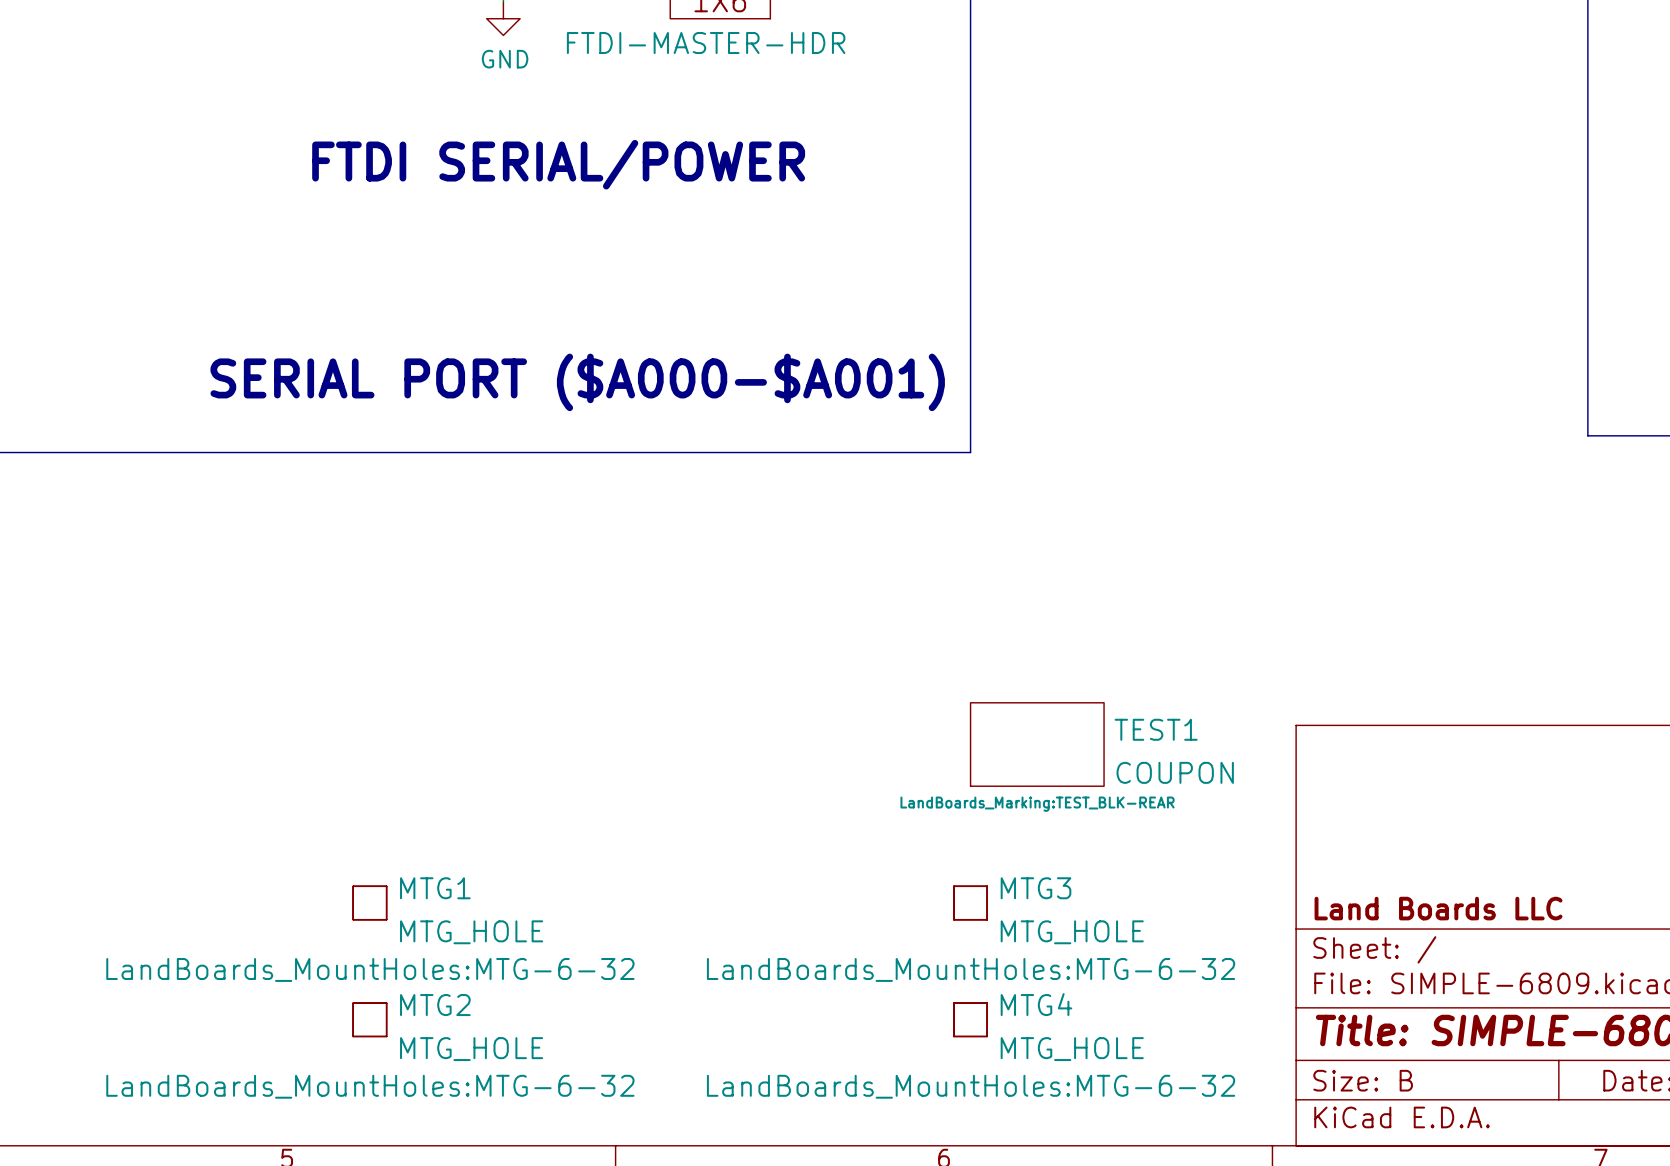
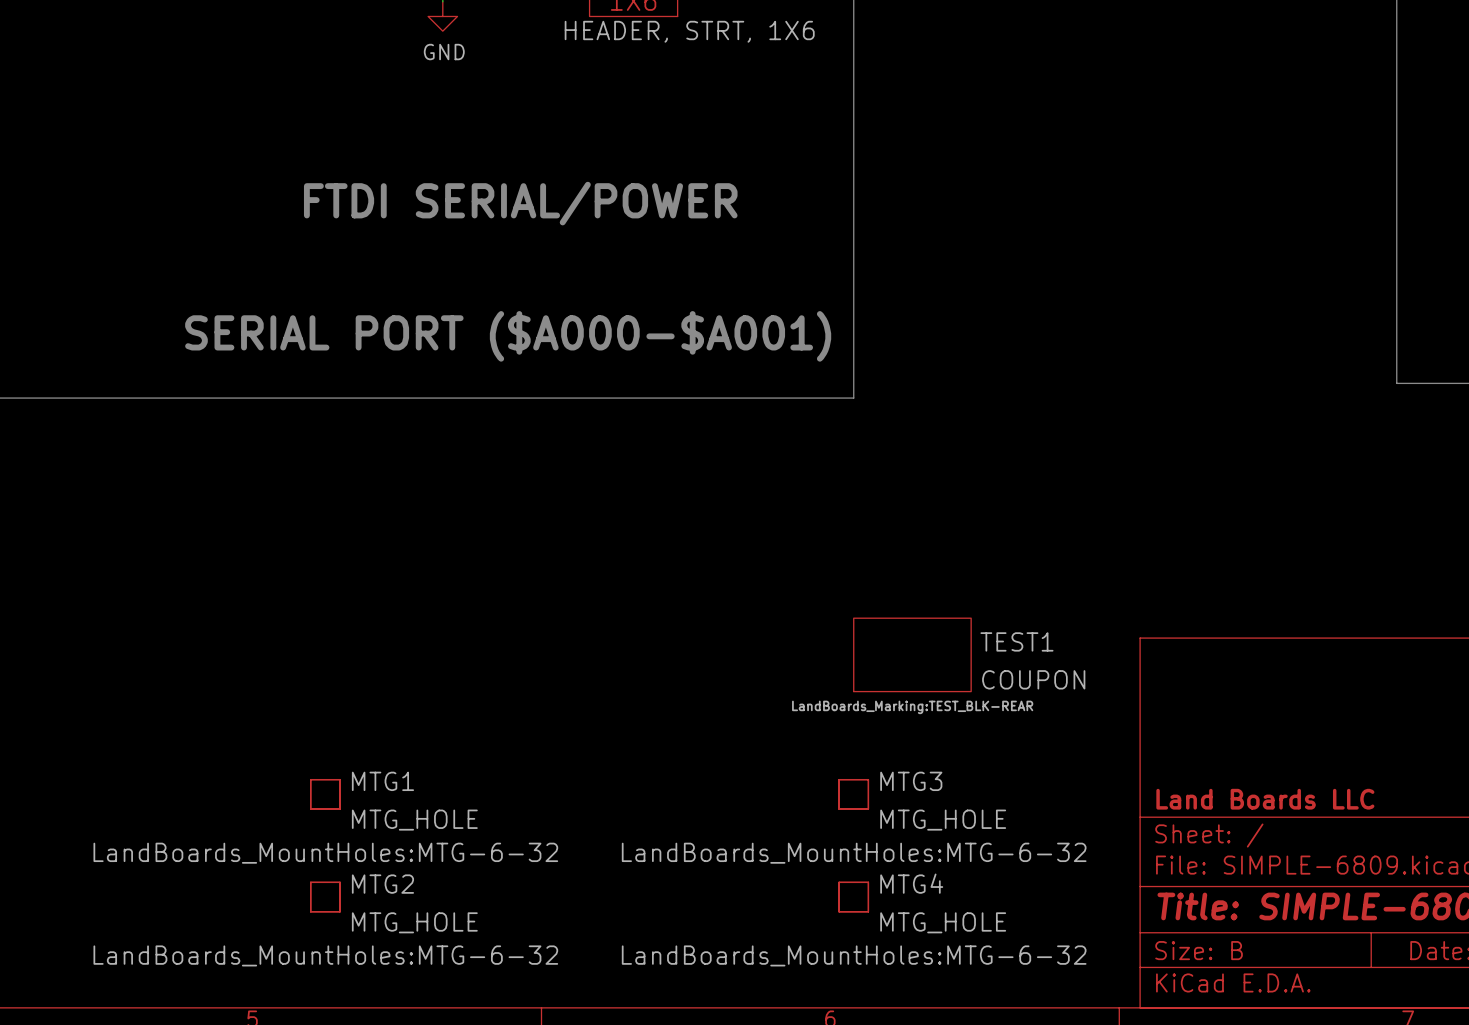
part value: FTDI-MASTER-HDR (706, 43) -> HEADER, STRT, 1X6 (689, 31)
text position: FTDI SERIAL/POWER (558, 164) -> FTDI SERIAL/POWER (520, 203)

